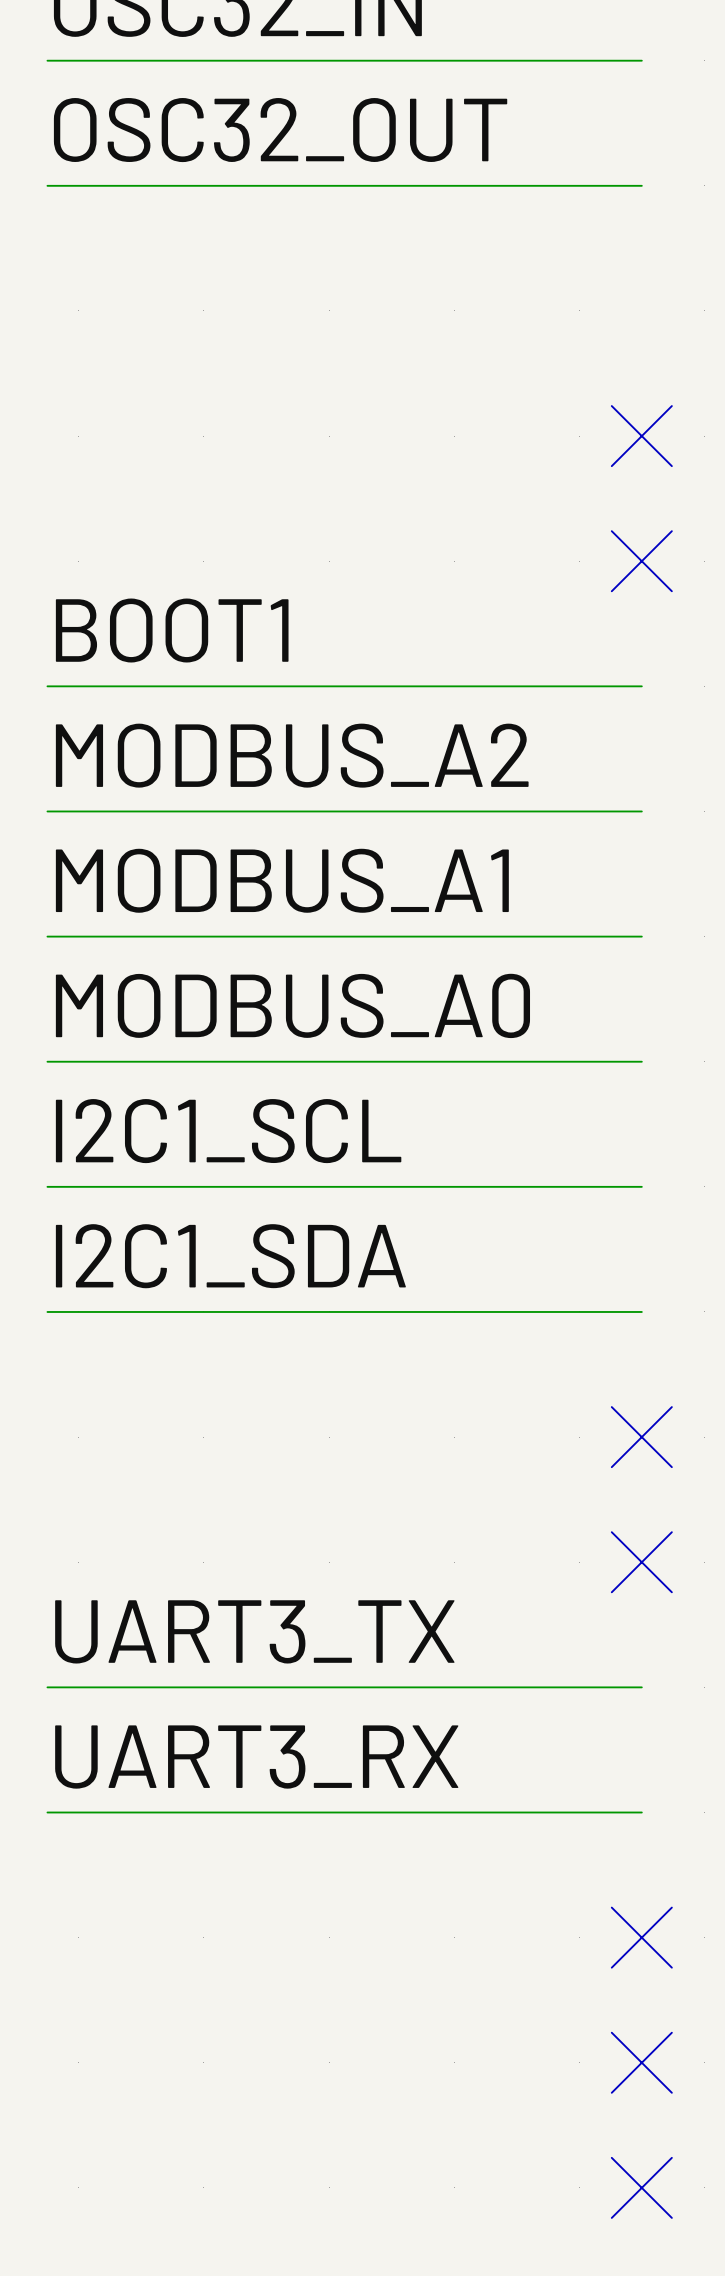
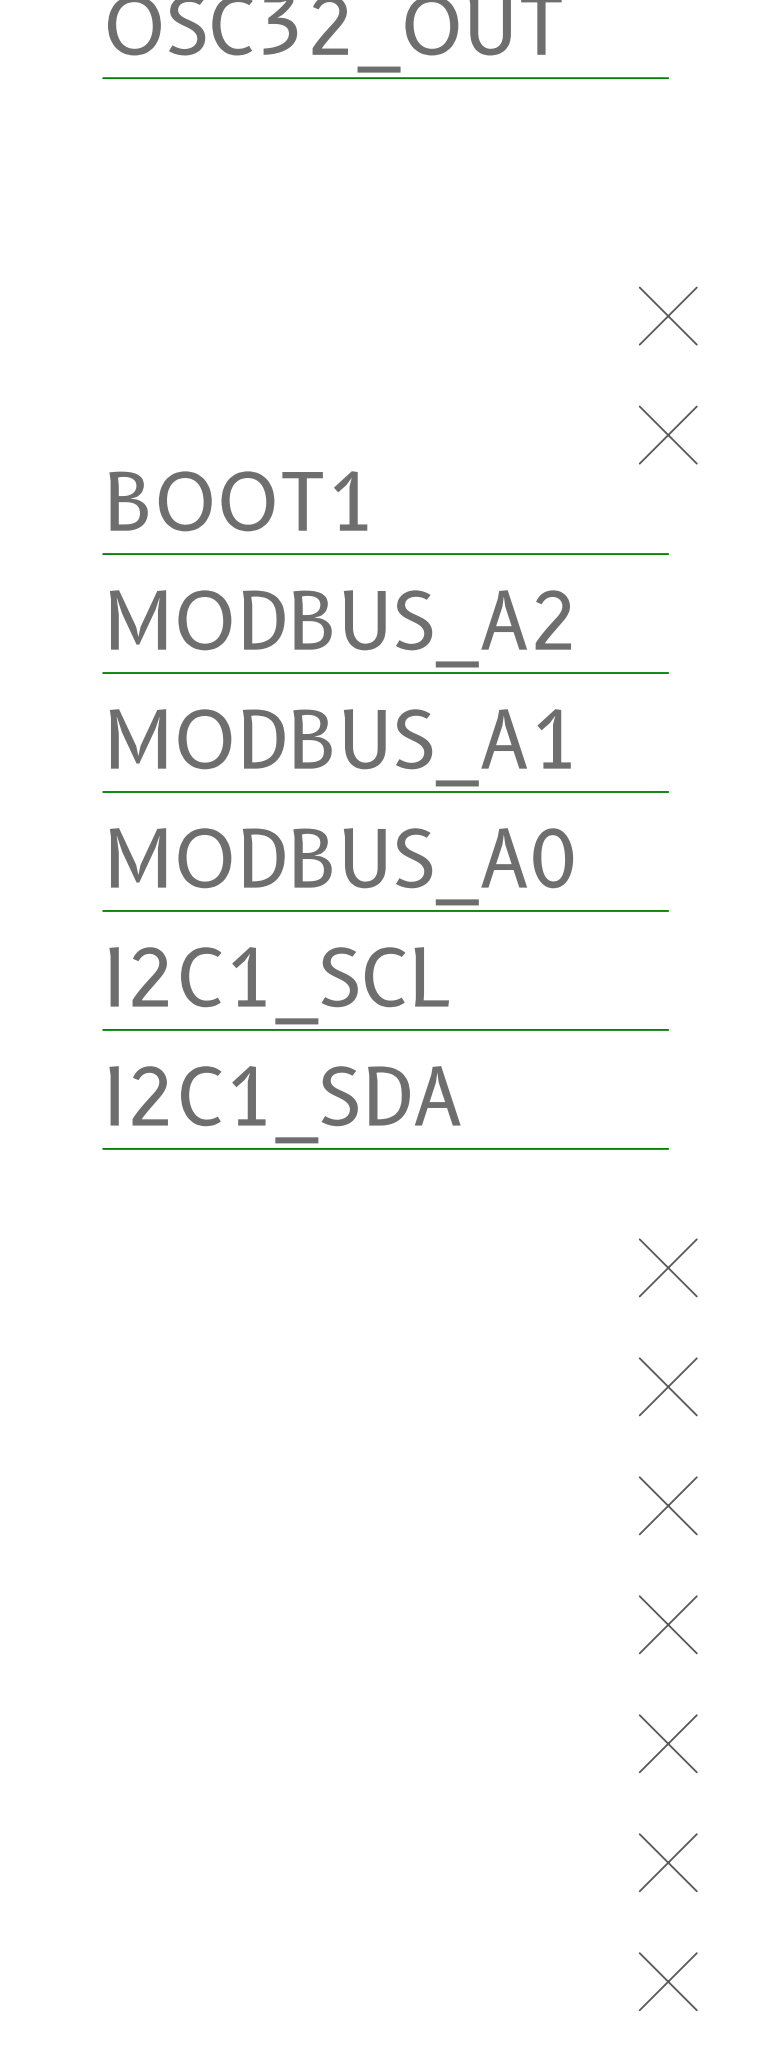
label: UART3_TX (254, 1631) -> none
wire: (47, 1687) (641, 1687) -> none
no-connect mark: none -> (668, 1505)
label: UART3_RX (256, 1757) -> none
wire: (47, 1812) (641, 1812) -> none
no-connect mark: none -> (668, 1624)

